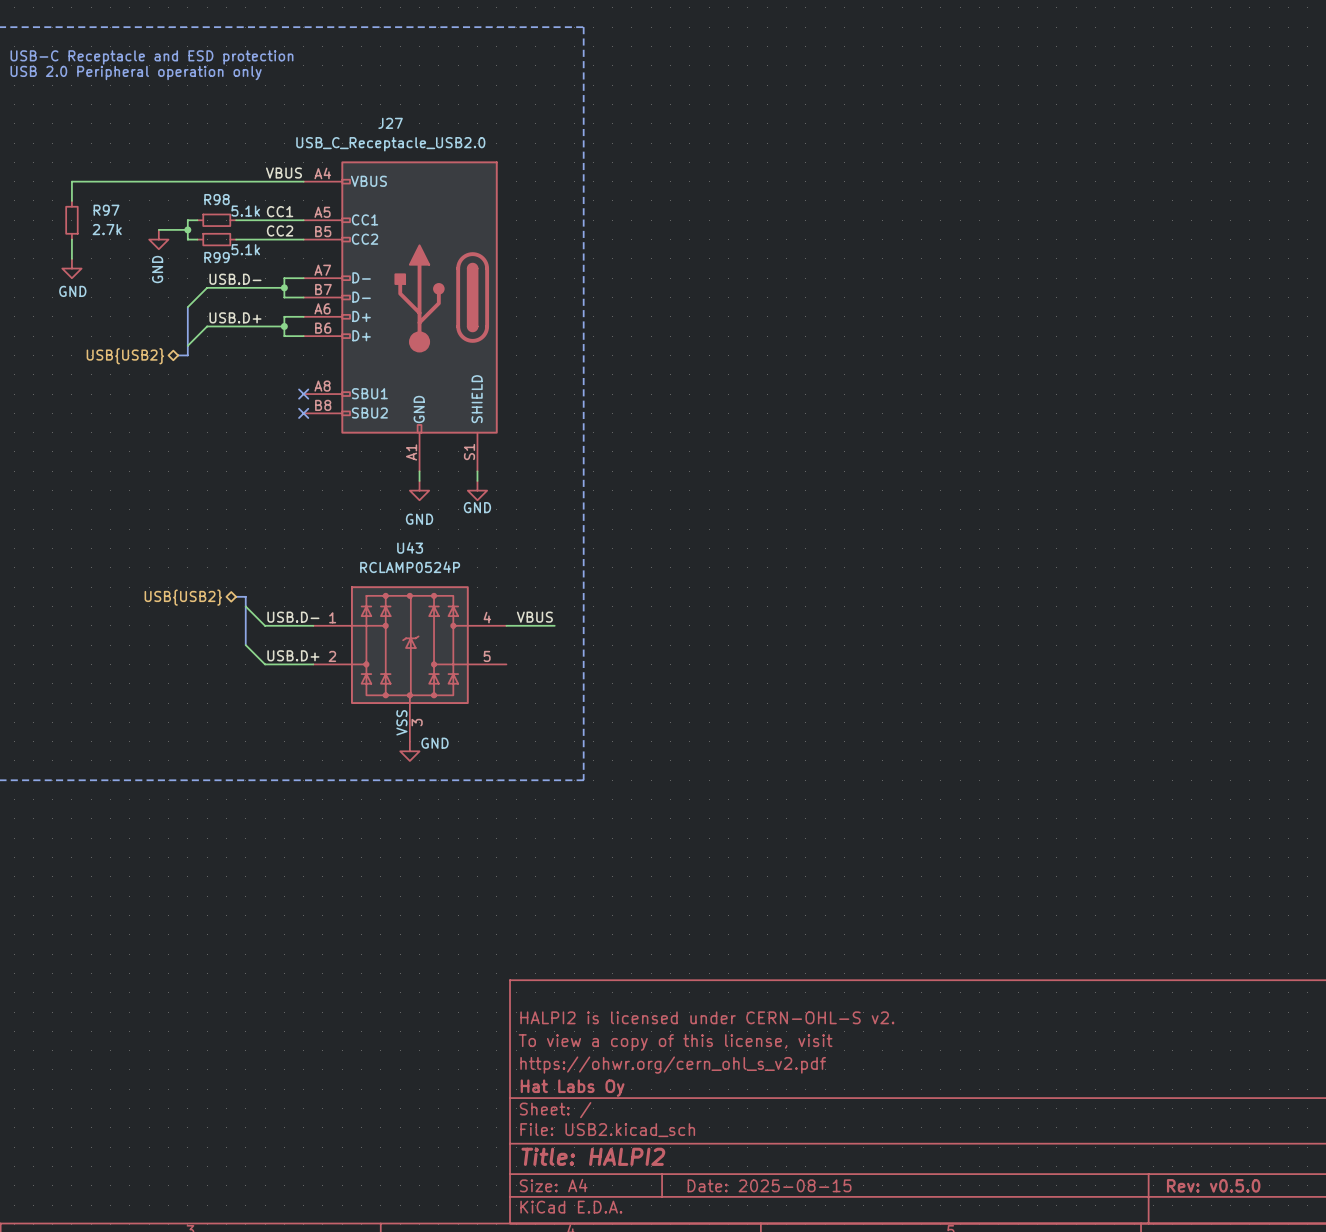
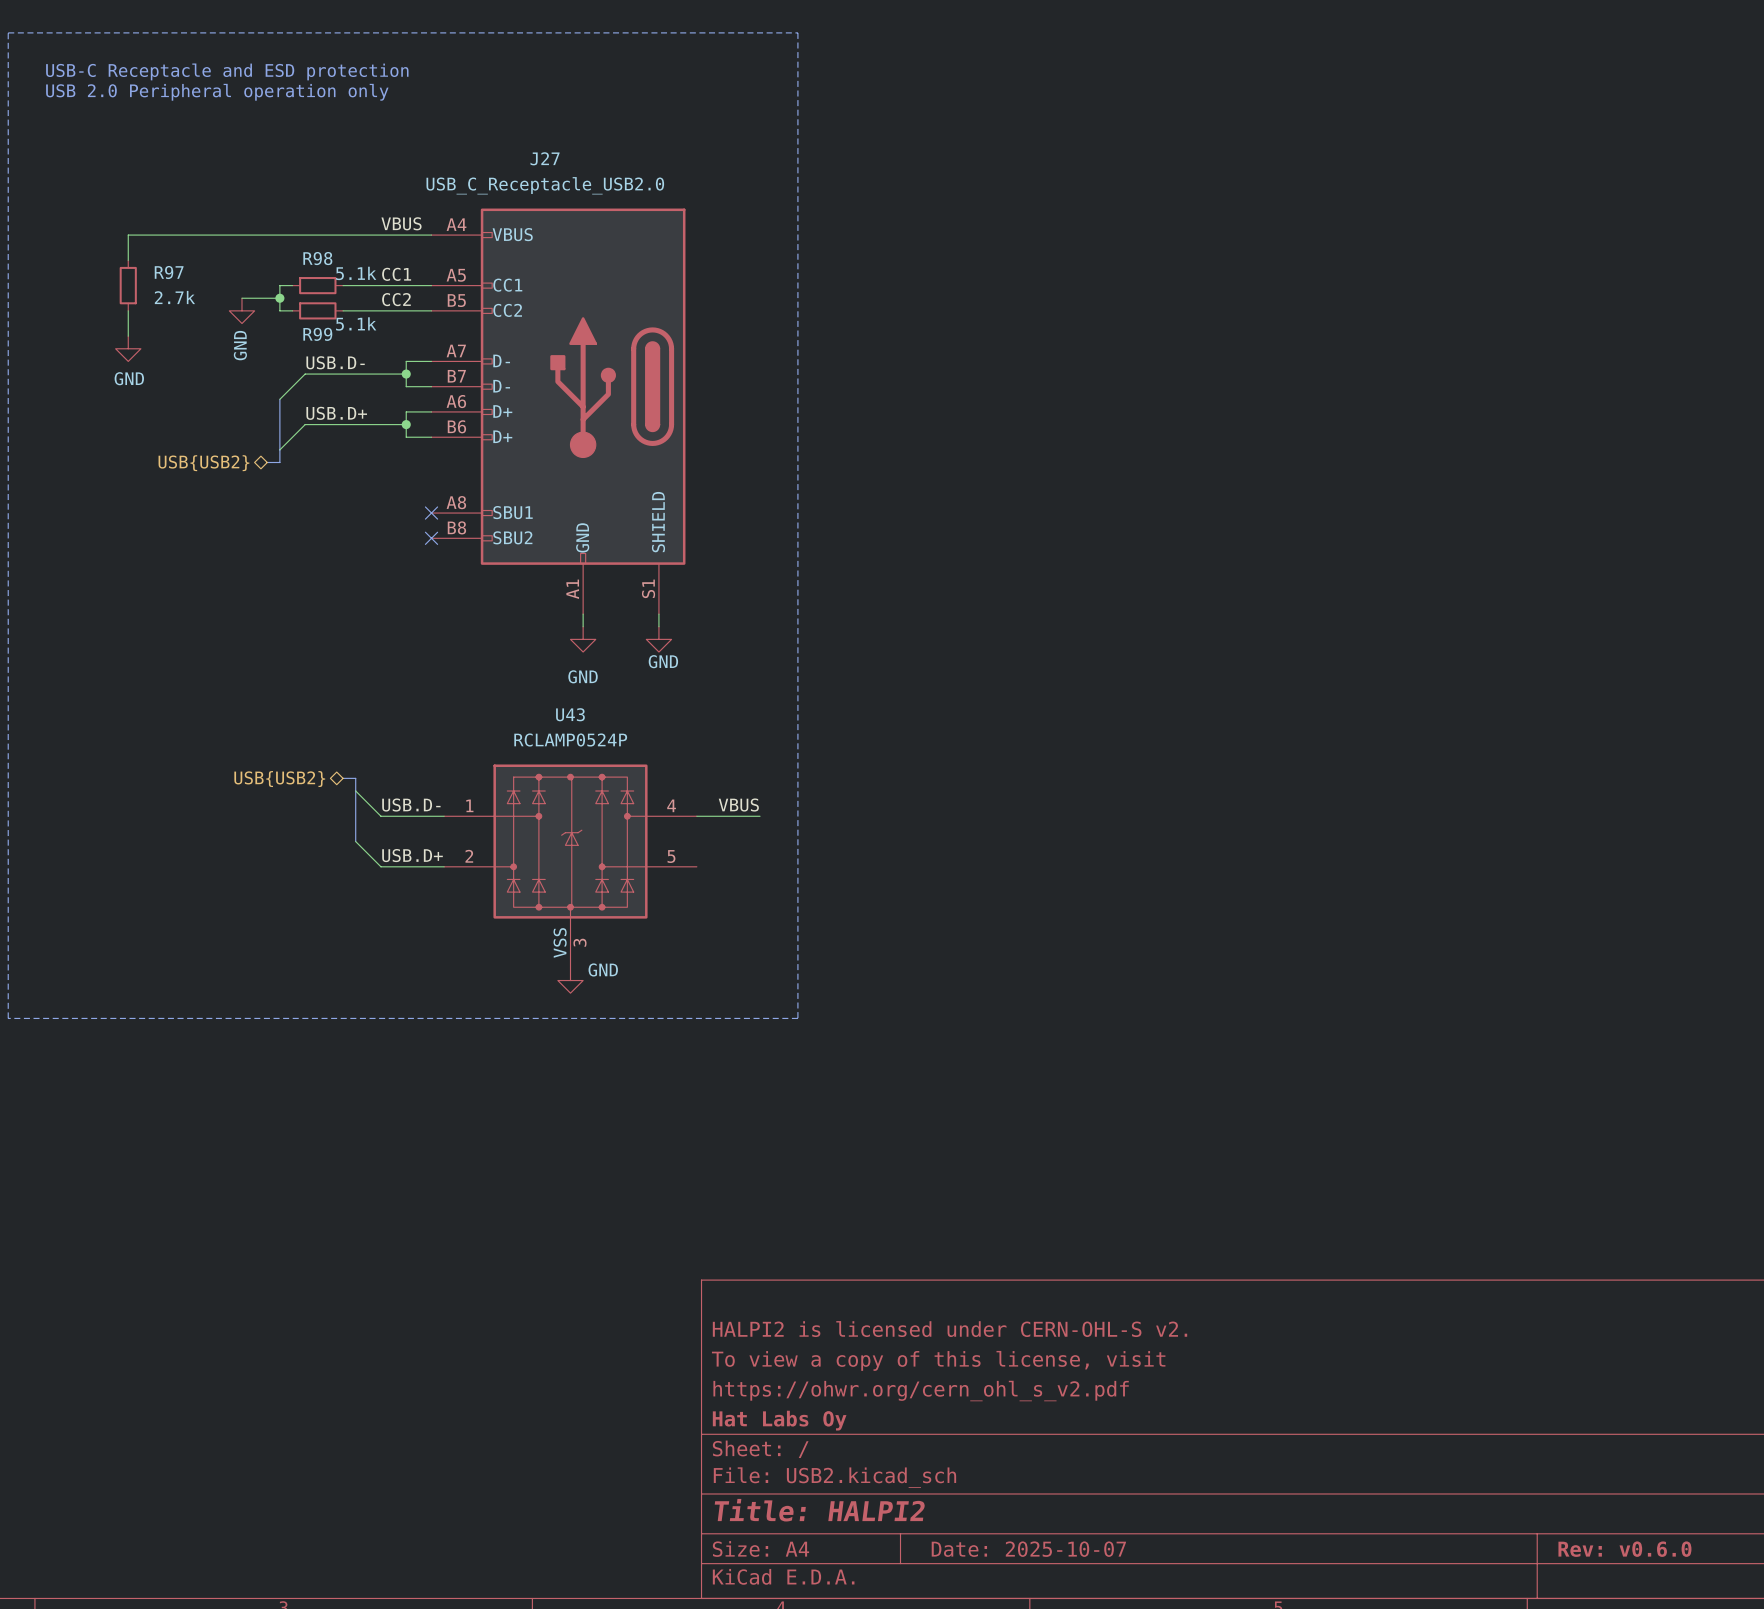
title block: Date: 2025-08-15 (769, 1185) -> Date: 2025-10-07 (1028, 1549)
title block: Rev: v0.5.0 (1213, 1185) -> Rev: v0.6.0 (1624, 1549)

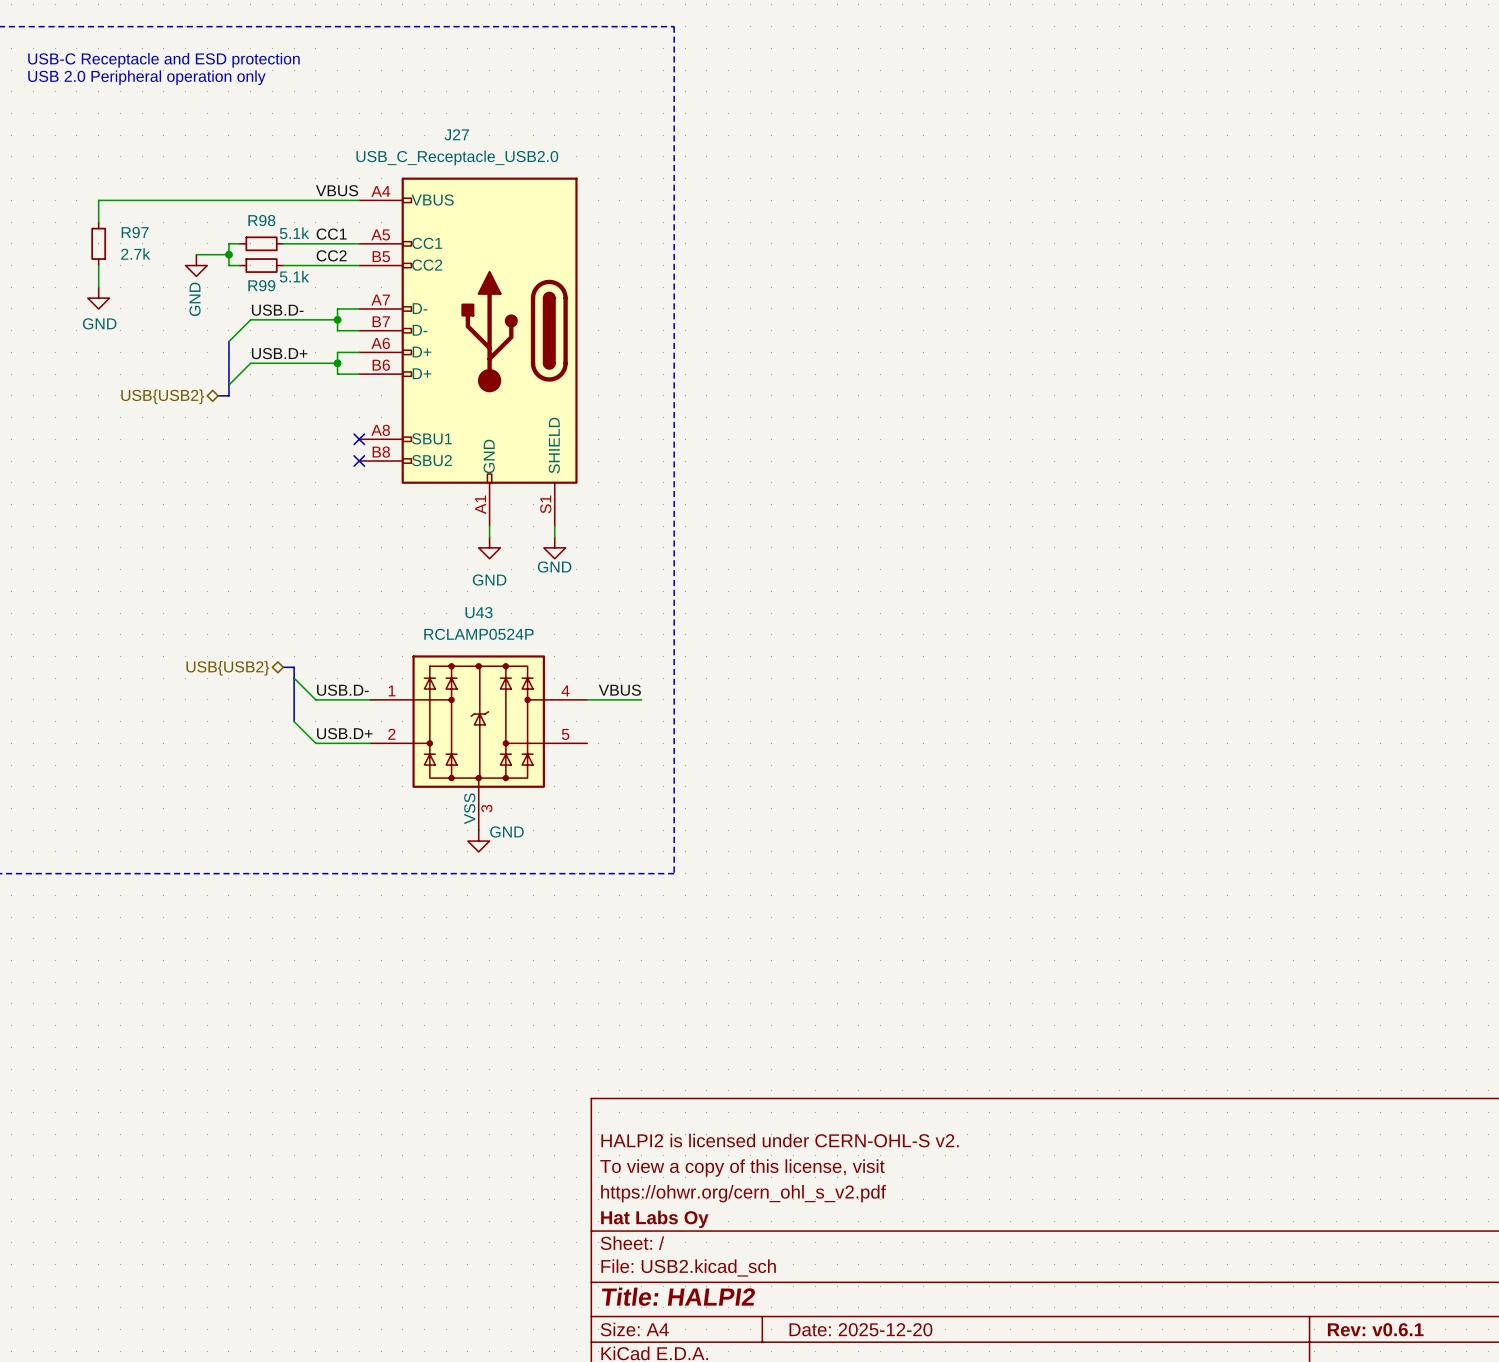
title block: Date: 2025-10-07 (1028, 1549) -> Date: 2025-12-20 (860, 1329)
title block: Rev: v0.6.0 (1624, 1549) -> Rev: v0.6.1 (1375, 1329)

